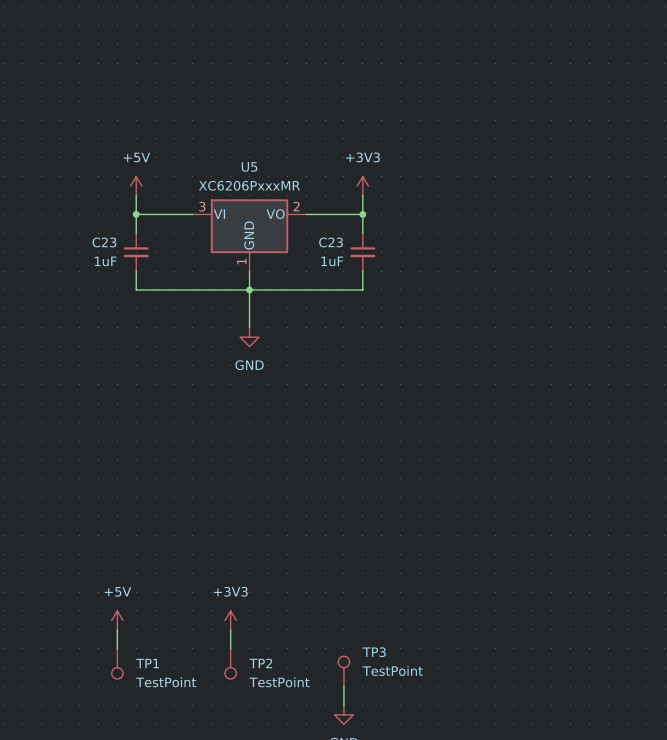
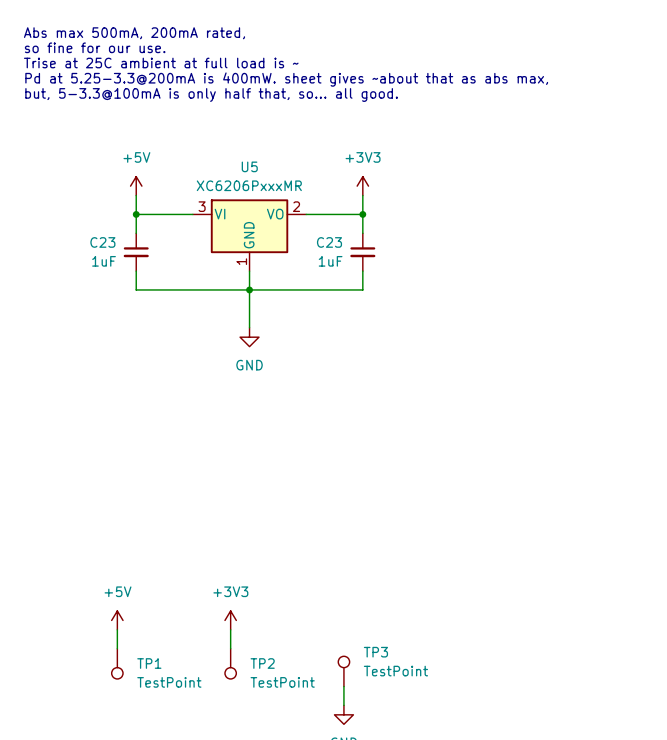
text: none -> Abs max 500mA, 200mA rated, (134, 33)
text: none -> so fine for our use. (95, 47)
text: none -> Trise at 25C ambient at full load is ~ (161, 63)
text: none -> Pd at 5.25-3.3@200mA is 400mW. sheet gives ~about that as abs max, (286, 79)
text: none -> but, 5-3.3@100mA is only half that, so... all good. (211, 94)

